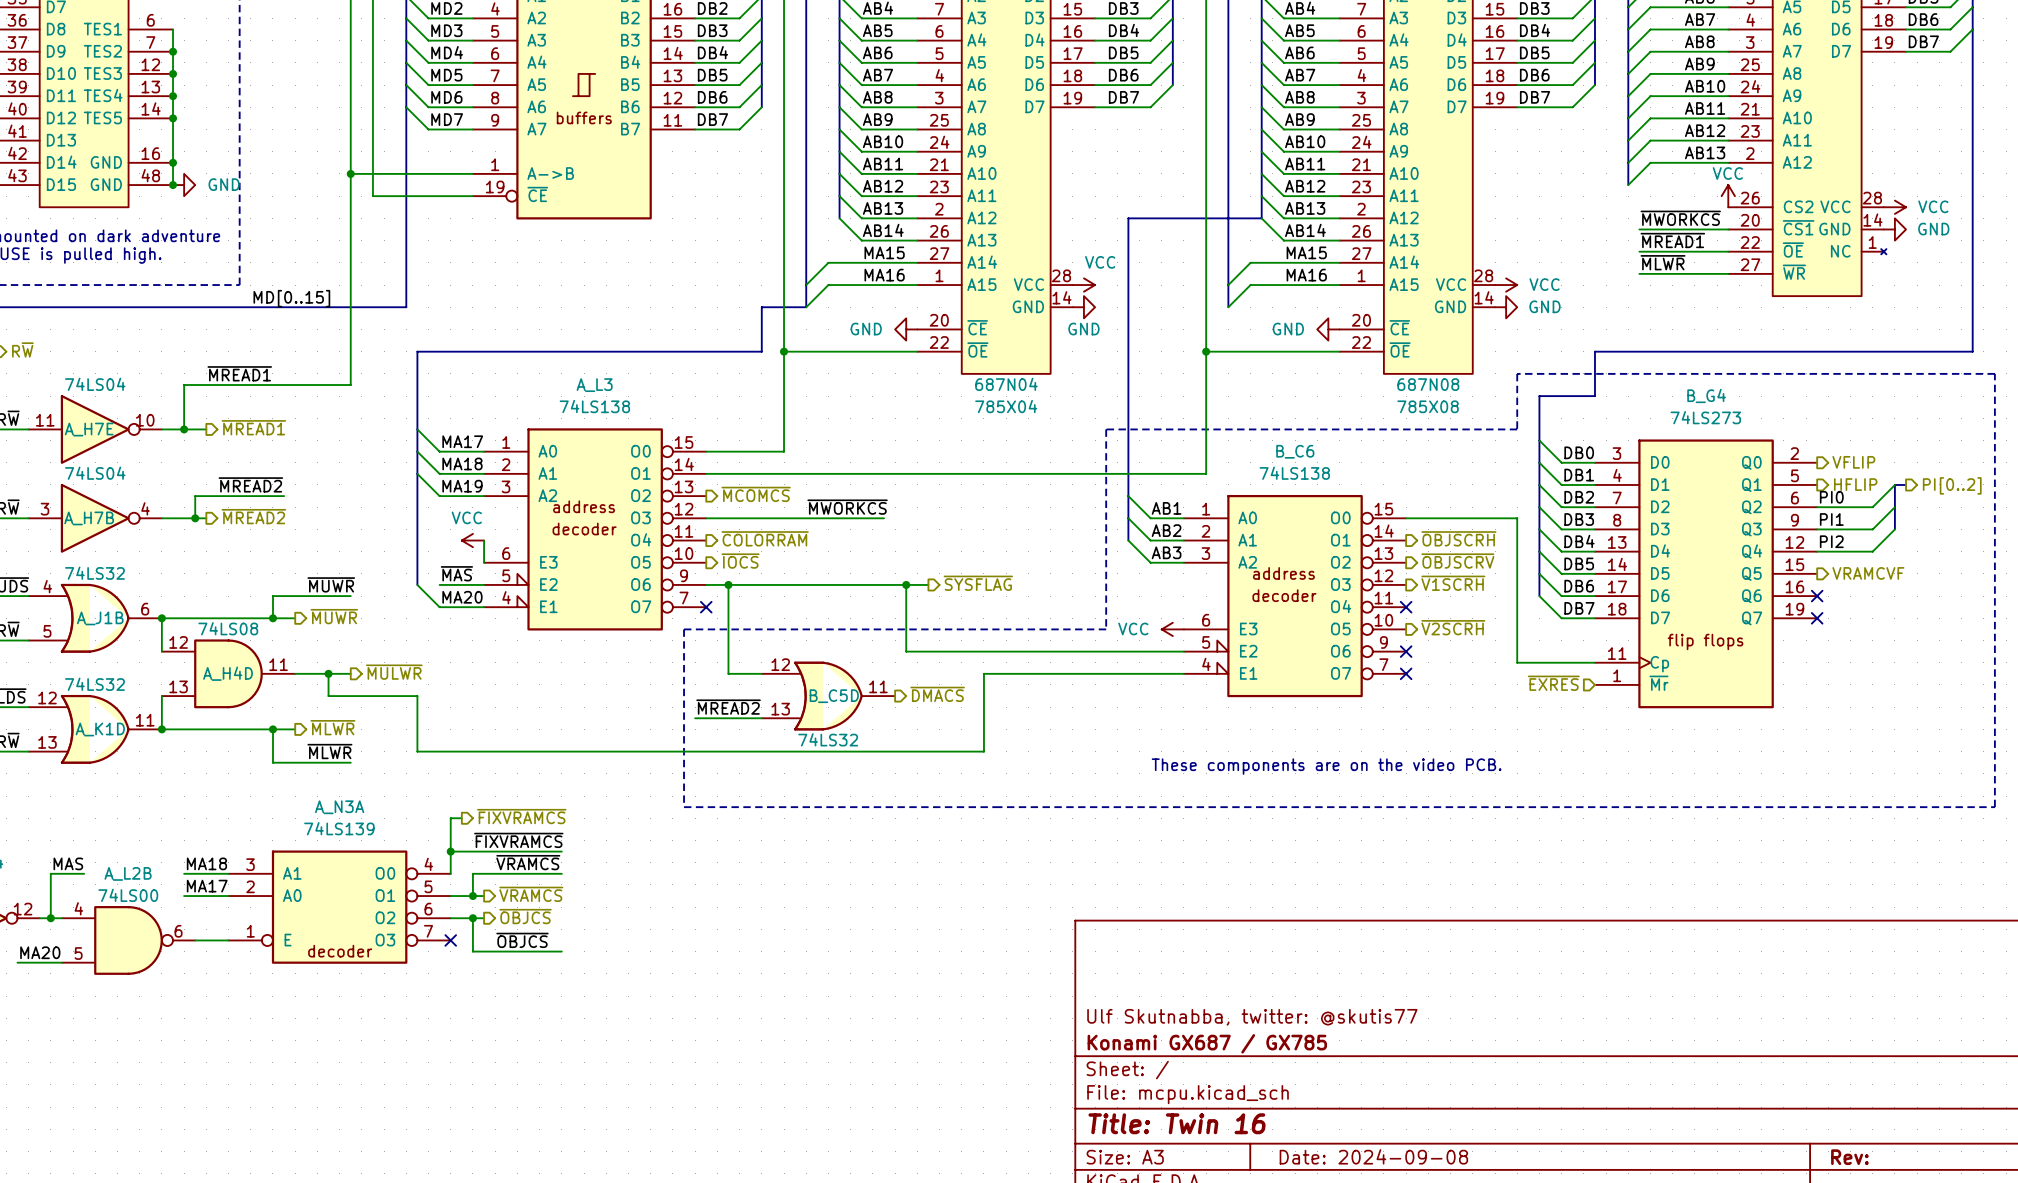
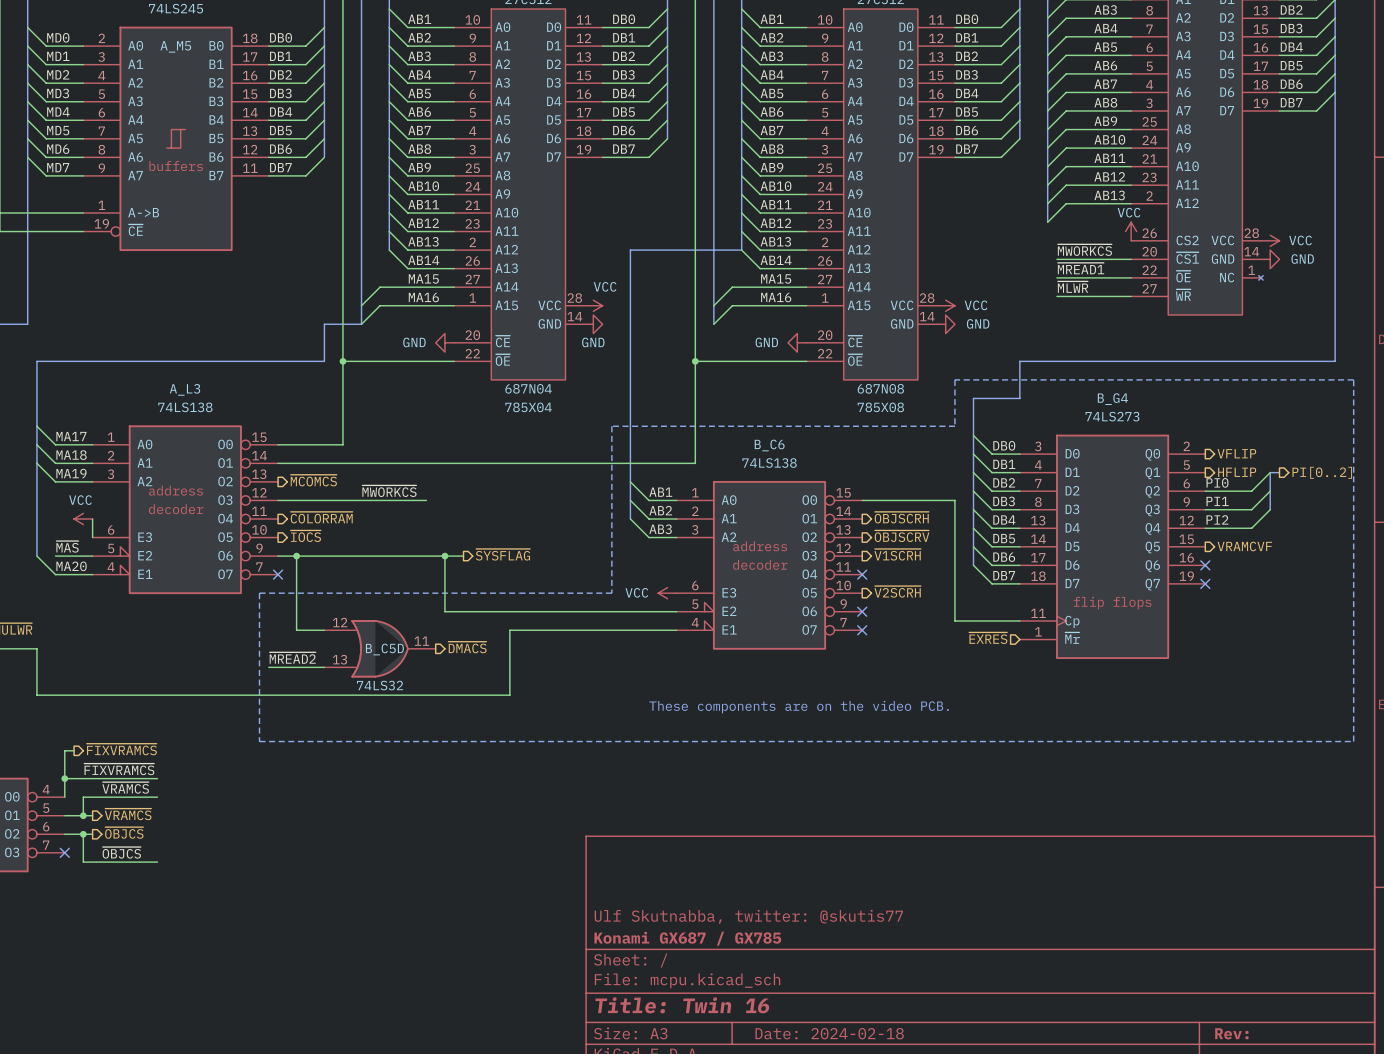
title block: Date: 2024-09-08 (1373, 1156) -> Date: 2024-02-18 (829, 1033)

